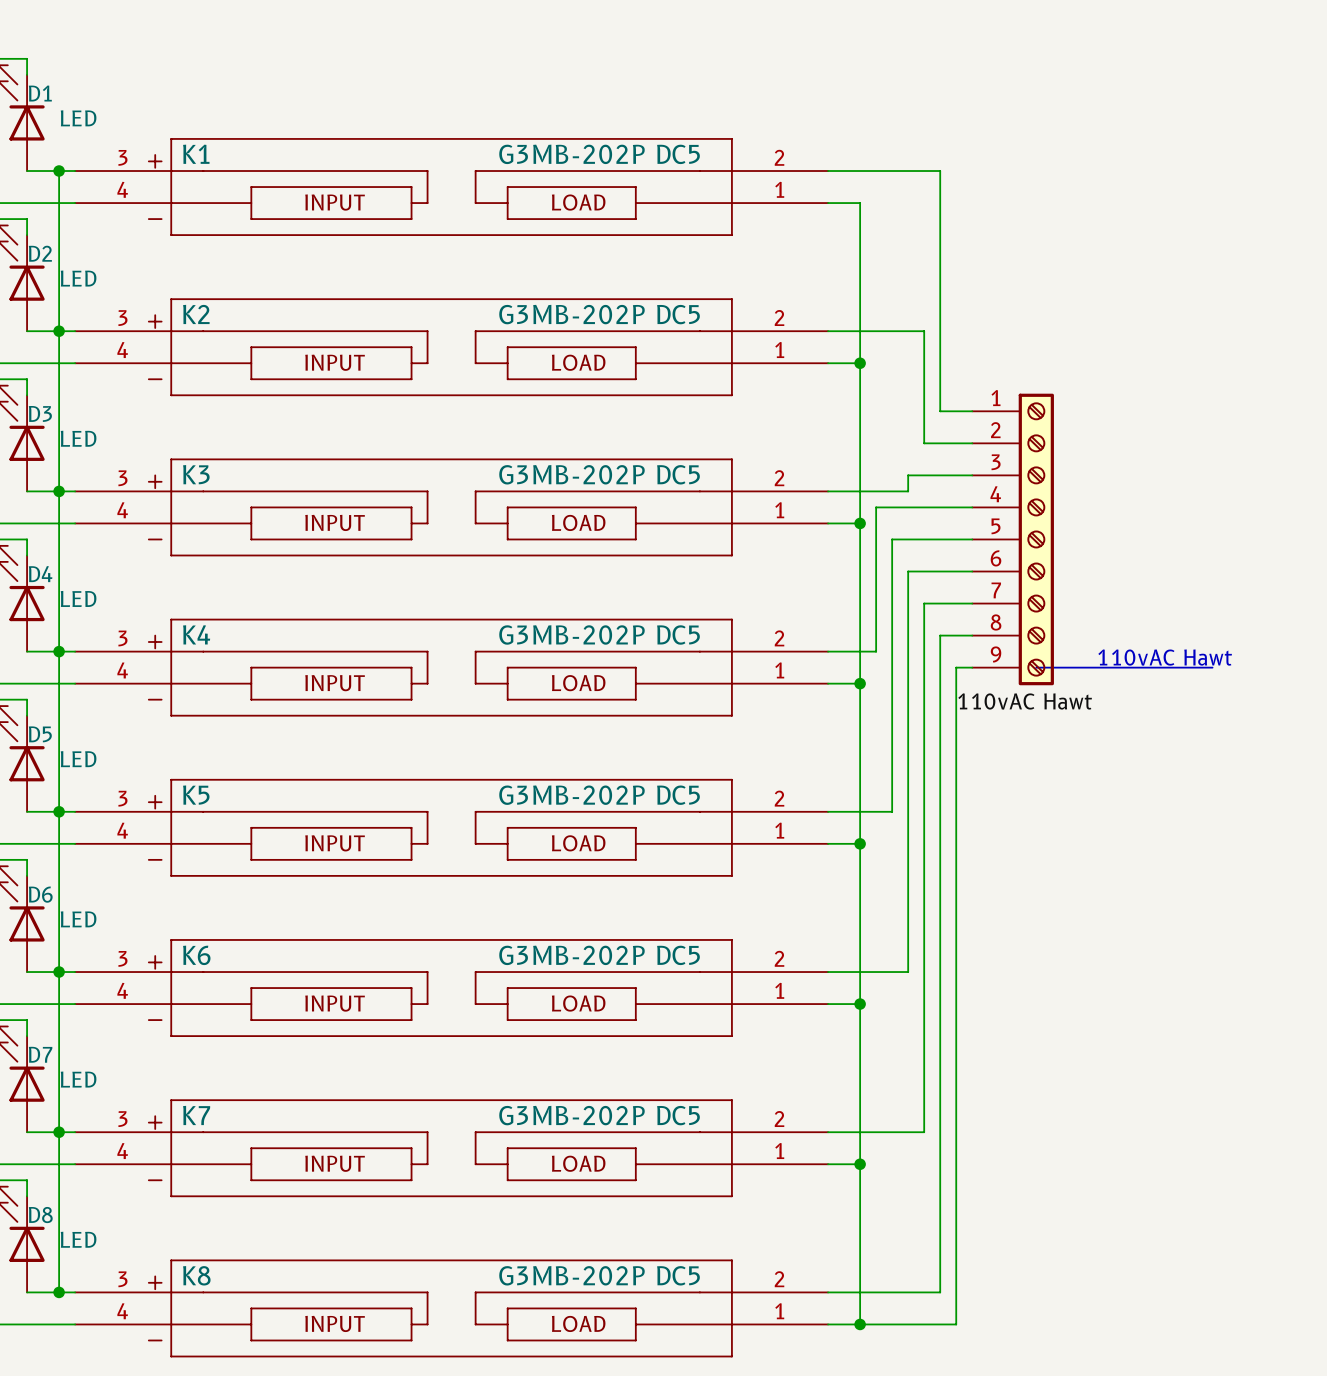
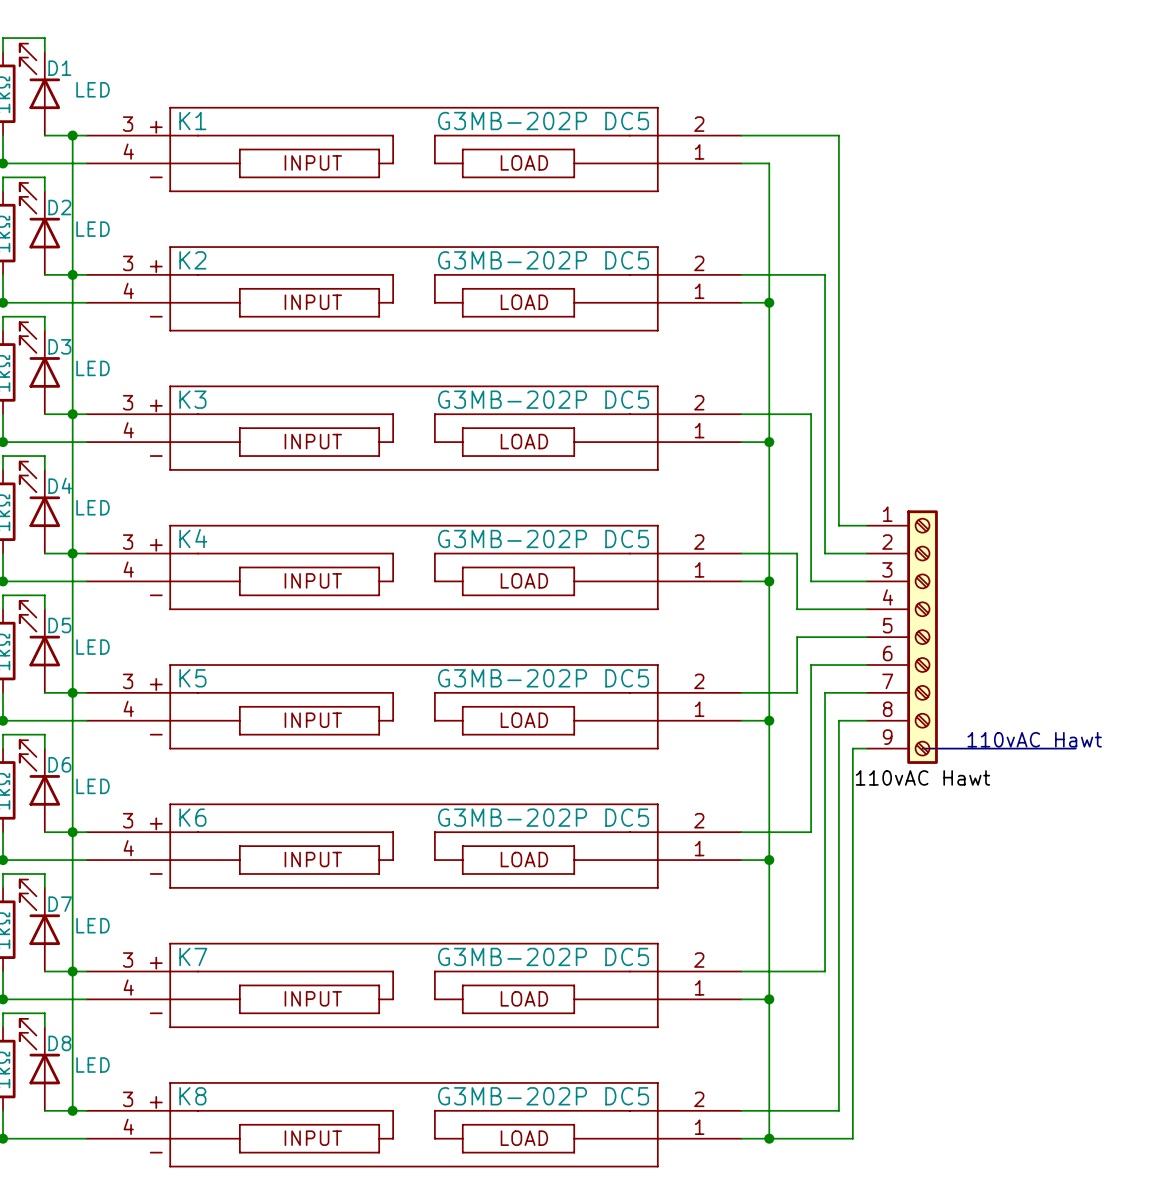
wire: (940, 411) (972, 411) -> (838, 344) (838, 525) (866, 525)
wire: (924, 443) (972, 443) -> (825, 372) (825, 511)
wire: (972, 475) (908, 475) (908, 491) -> none
wire: (972, 507) (876, 507) (876, 651) -> none
wire: (972, 539) (892, 539) (892, 651) -> (783, 553) (797, 553)
part position: (1013, 539) -> (902, 637)
wire: (908, 571) (972, 571) -> (811, 483) (811, 414)
wire: (924, 603) (972, 603) -> (825, 692) (866, 692)
wire: (972, 635) (940, 635) (940, 843) -> (866, 720) (838, 720)
wire: (924, 651) (924, 811) -> (825, 553) (866, 553)
text position: 110vAC Hawt (1165, 657) -> 110vAC Hawt (1034, 739)
wire: (972, 667) (956, 667) (956, 875) -> (866, 748) (852, 748)
line: (1036, 667) (1212, 667) -> (922, 748) (1075, 748)
wire: (908, 683) (908, 779) -> (811, 581) (866, 581)
label position: 110vAC Hawt (1025, 701) -> 110vAC Hawt (922, 777)
wire: (892, 715) (892, 747) -> (797, 609) (866, 609)
wire: none -> (797, 637) (866, 637)
wire: none -> (811, 665) (866, 665)

